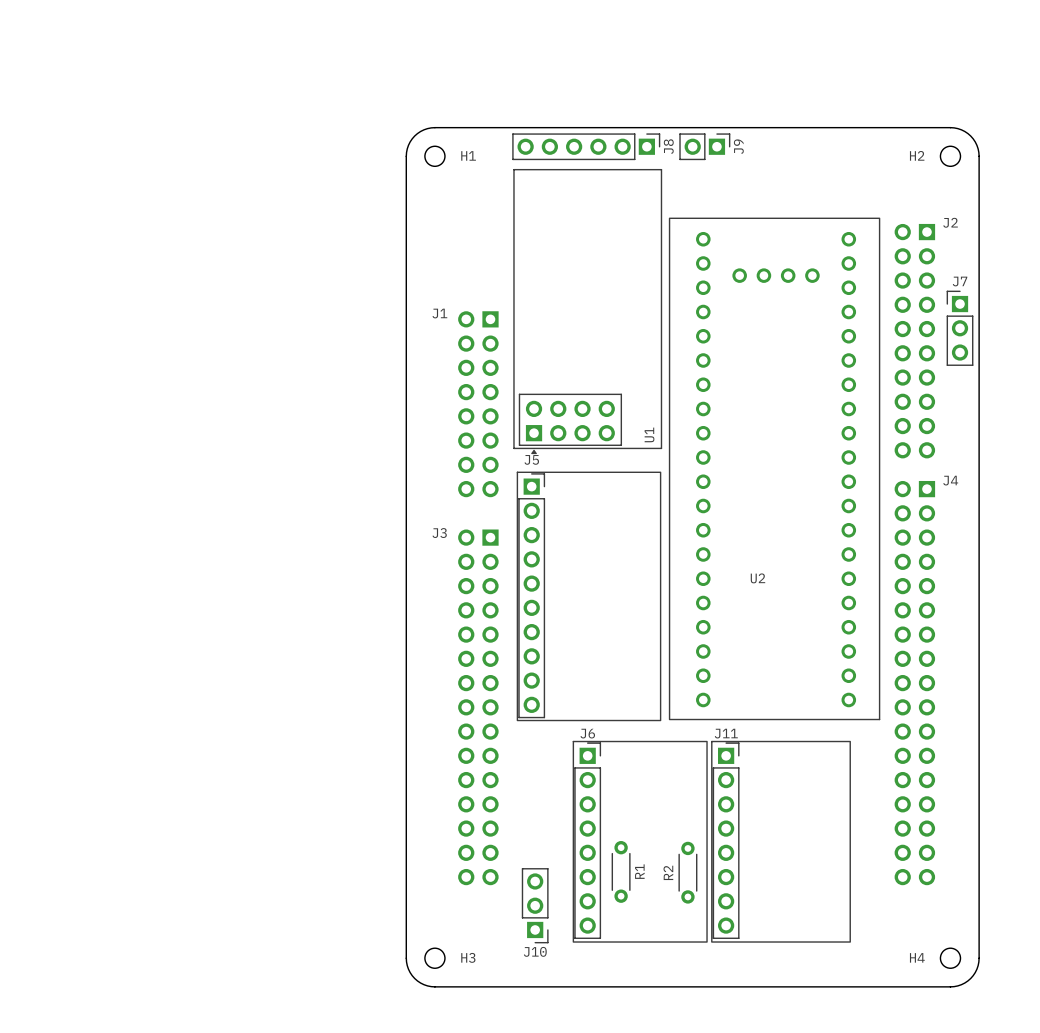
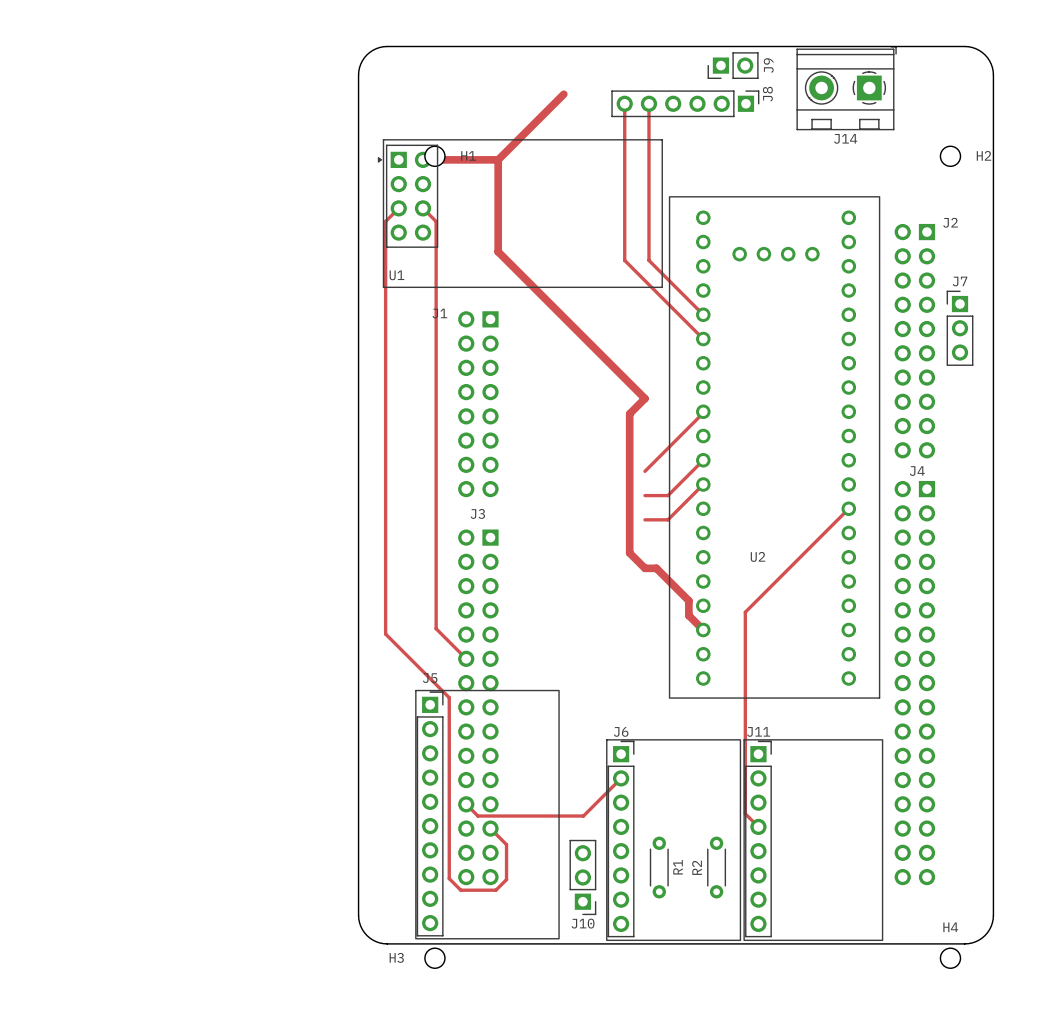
J14: none -> (846, 88)
track: none -> (563, 94) (498, 159)
track: none -> (624, 103) (624, 260) (703, 339)
track: none -> (648, 103) (648, 260) (703, 314)
board edge: (434, 127) (950, 127) (964, 131) (975, 141) (979, 156) (979, 958) (975, 972) (964, 983) (950, 986) (434, 986) (420, 983) (410, 972) (406, 958) (406, 156) (408, 145) (414, 136) (423, 129) (434, 127) -> (387, 46) (376, 48) (366, 54) (360, 64) (358, 75) (358, 915) (362, 929) (372, 940) (387, 943) (964, 943) (979, 940) (989, 929) (993, 915) (993, 75) (989, 60) (979, 50) (964, 46) (387, 46)
J8 position: (586, 146) -> (685, 103)
J8 name position: J8 (668, 146) -> J8 (767, 94)
J9 rotation: 0° (704, 146) -> 180° (733, 65)
J9 position: (704, 146) -> (733, 65)
H2 name position: H2 (917, 155) -> H2 (984, 155)
track: none -> (423, 159) (498, 159)
track: none -> (498, 159) (498, 251) (644, 398) (629, 413) (629, 553) (644, 568) (656, 568) (688, 600) (688, 615) (703, 630)
track: none -> (398, 208) (385, 221) (385, 634) (449, 697) (449, 878) (460, 890) (495, 890) (506, 879) (506, 844) (490, 828)
track: none -> (423, 208) (436, 221) (436, 628) (466, 658)
U1 rotation: 0° (587, 311) -> 90° clockwise (520, 213)
track: none -> (699, 411) (703, 413) (644, 471)
track: none -> (703, 460) (667, 495) (644, 495)
U2 position: (774, 468) -> (774, 447)
J4 name position: J4 (950, 480) -> J4 (917, 471)
track: none -> (703, 484) (667, 519) (644, 519)
track: none -> (848, 508) (745, 612) (745, 813) (758, 826)
J3 name position: J3 (439, 533) -> J3 (477, 513)
J5 position: (589, 596) -> (487, 814)
track: none -> (621, 778) (583, 816) (477, 816) (466, 804)
J6 position: (640, 841) -> (673, 840)
J11 position: (781, 841) -> (813, 840)
R1 position: (621, 871) -> (659, 867)
R2 position: (687, 872) -> (716, 867)
J10 position: (535, 905) -> (582, 877)
H3 name position: H3 (468, 957) -> H3 (396, 957)
H4 name position: H4 (917, 957) -> H4 (950, 927)

